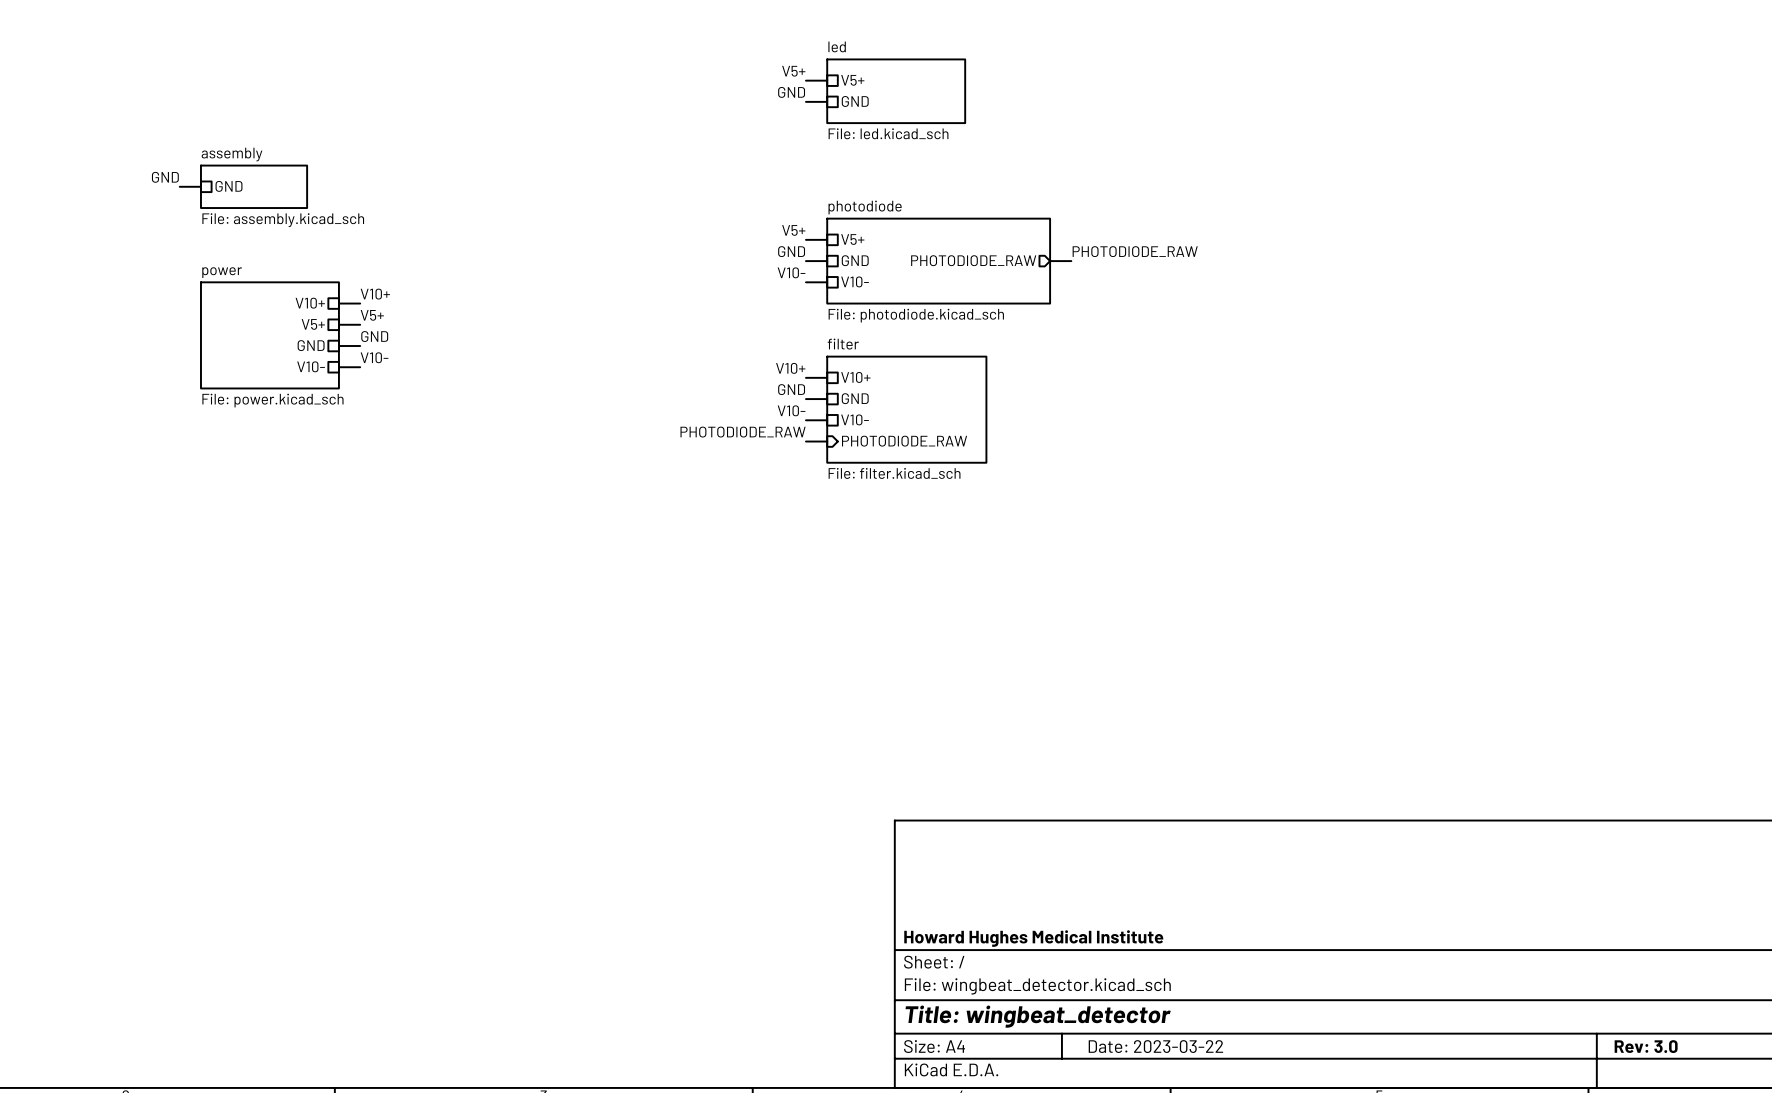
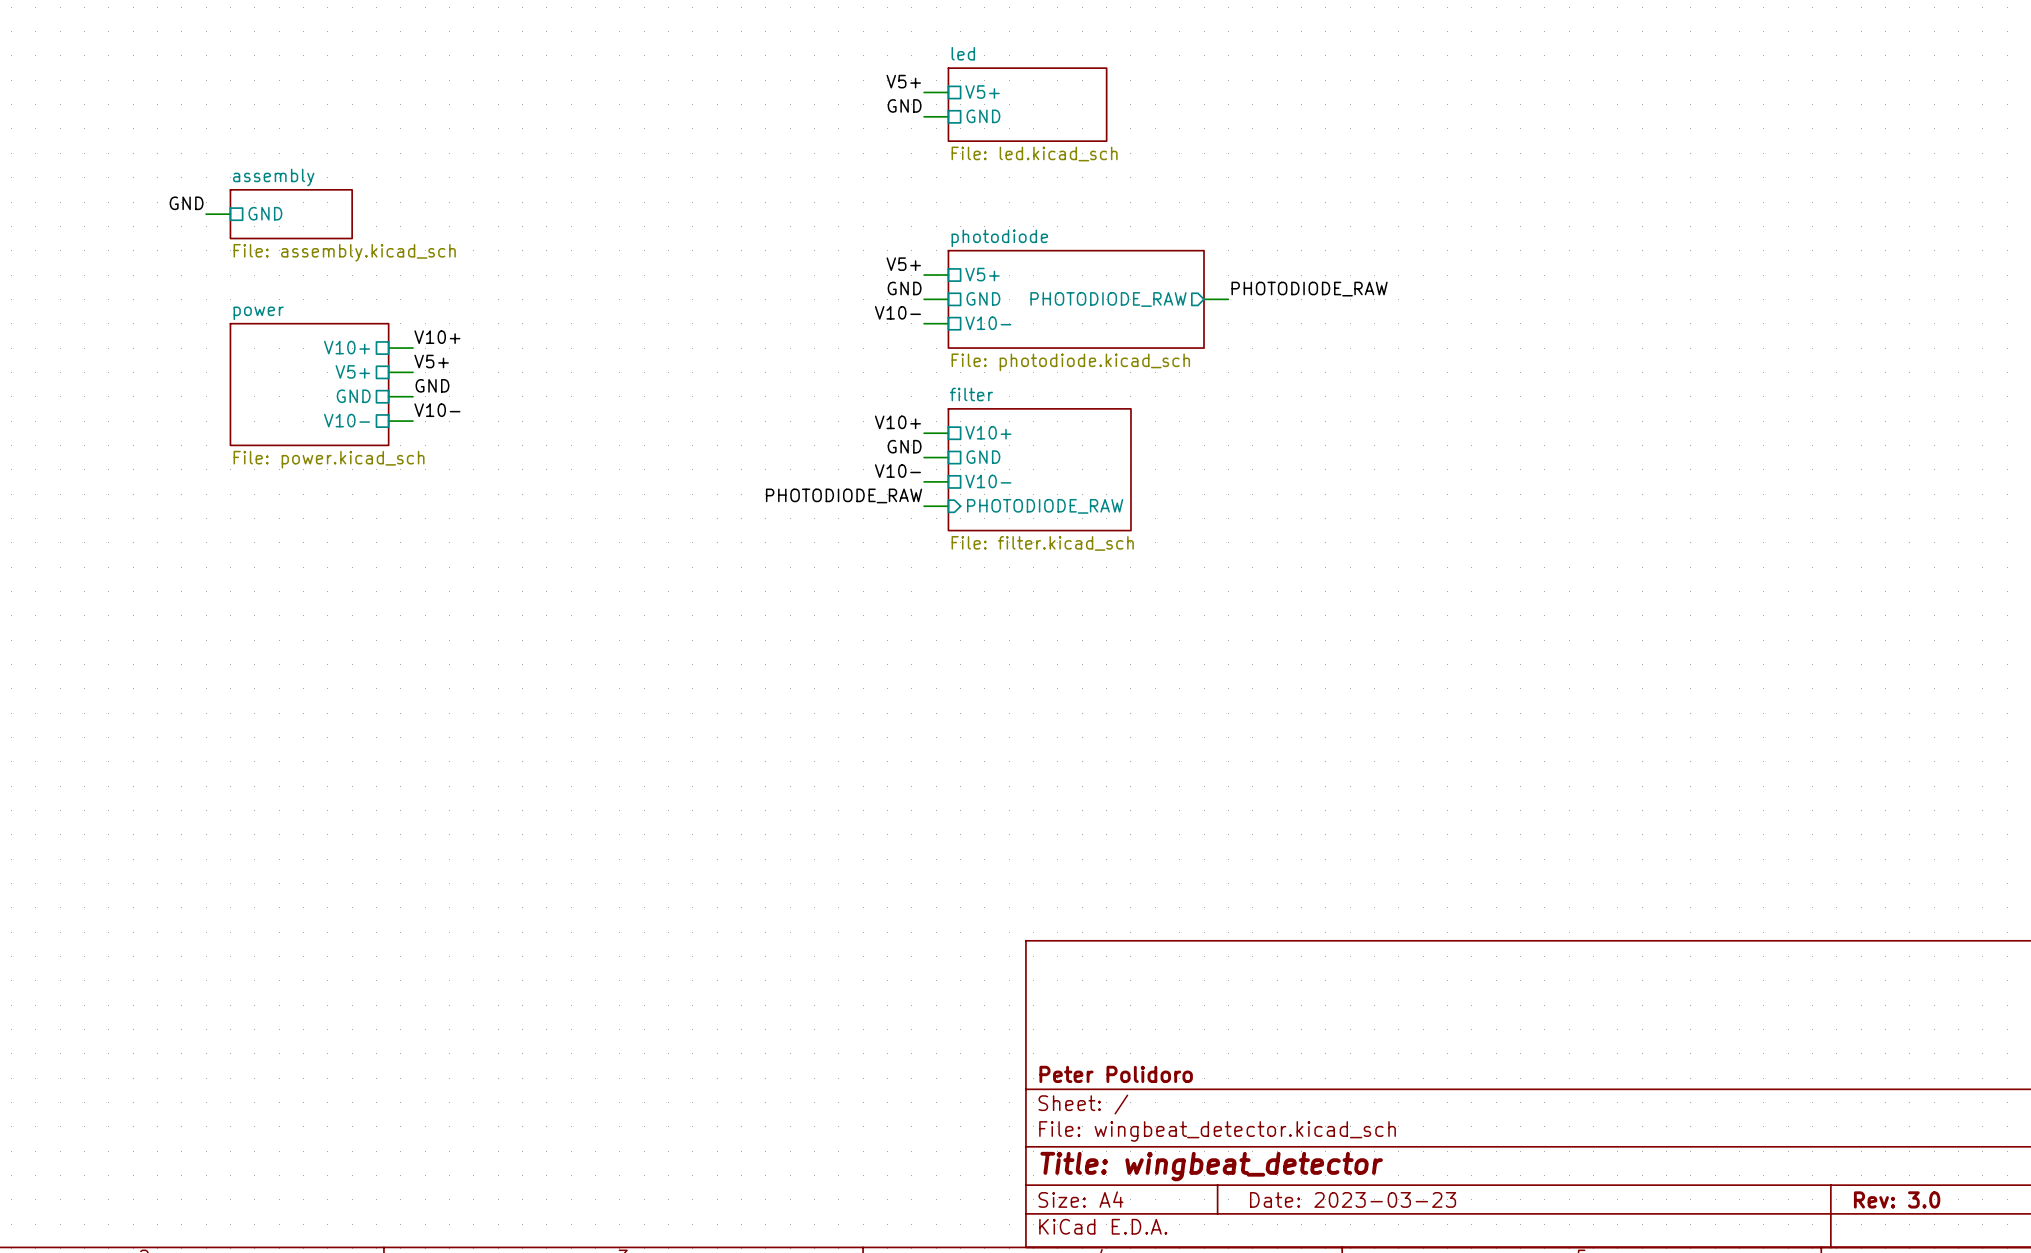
title block: Howard Hughes Medical Institute (1033, 938) -> Peter Polidoro (1116, 1074)
title block: Date: 2023-03-22 (1155, 1046) -> Date: 2023-03-23 (1353, 1199)

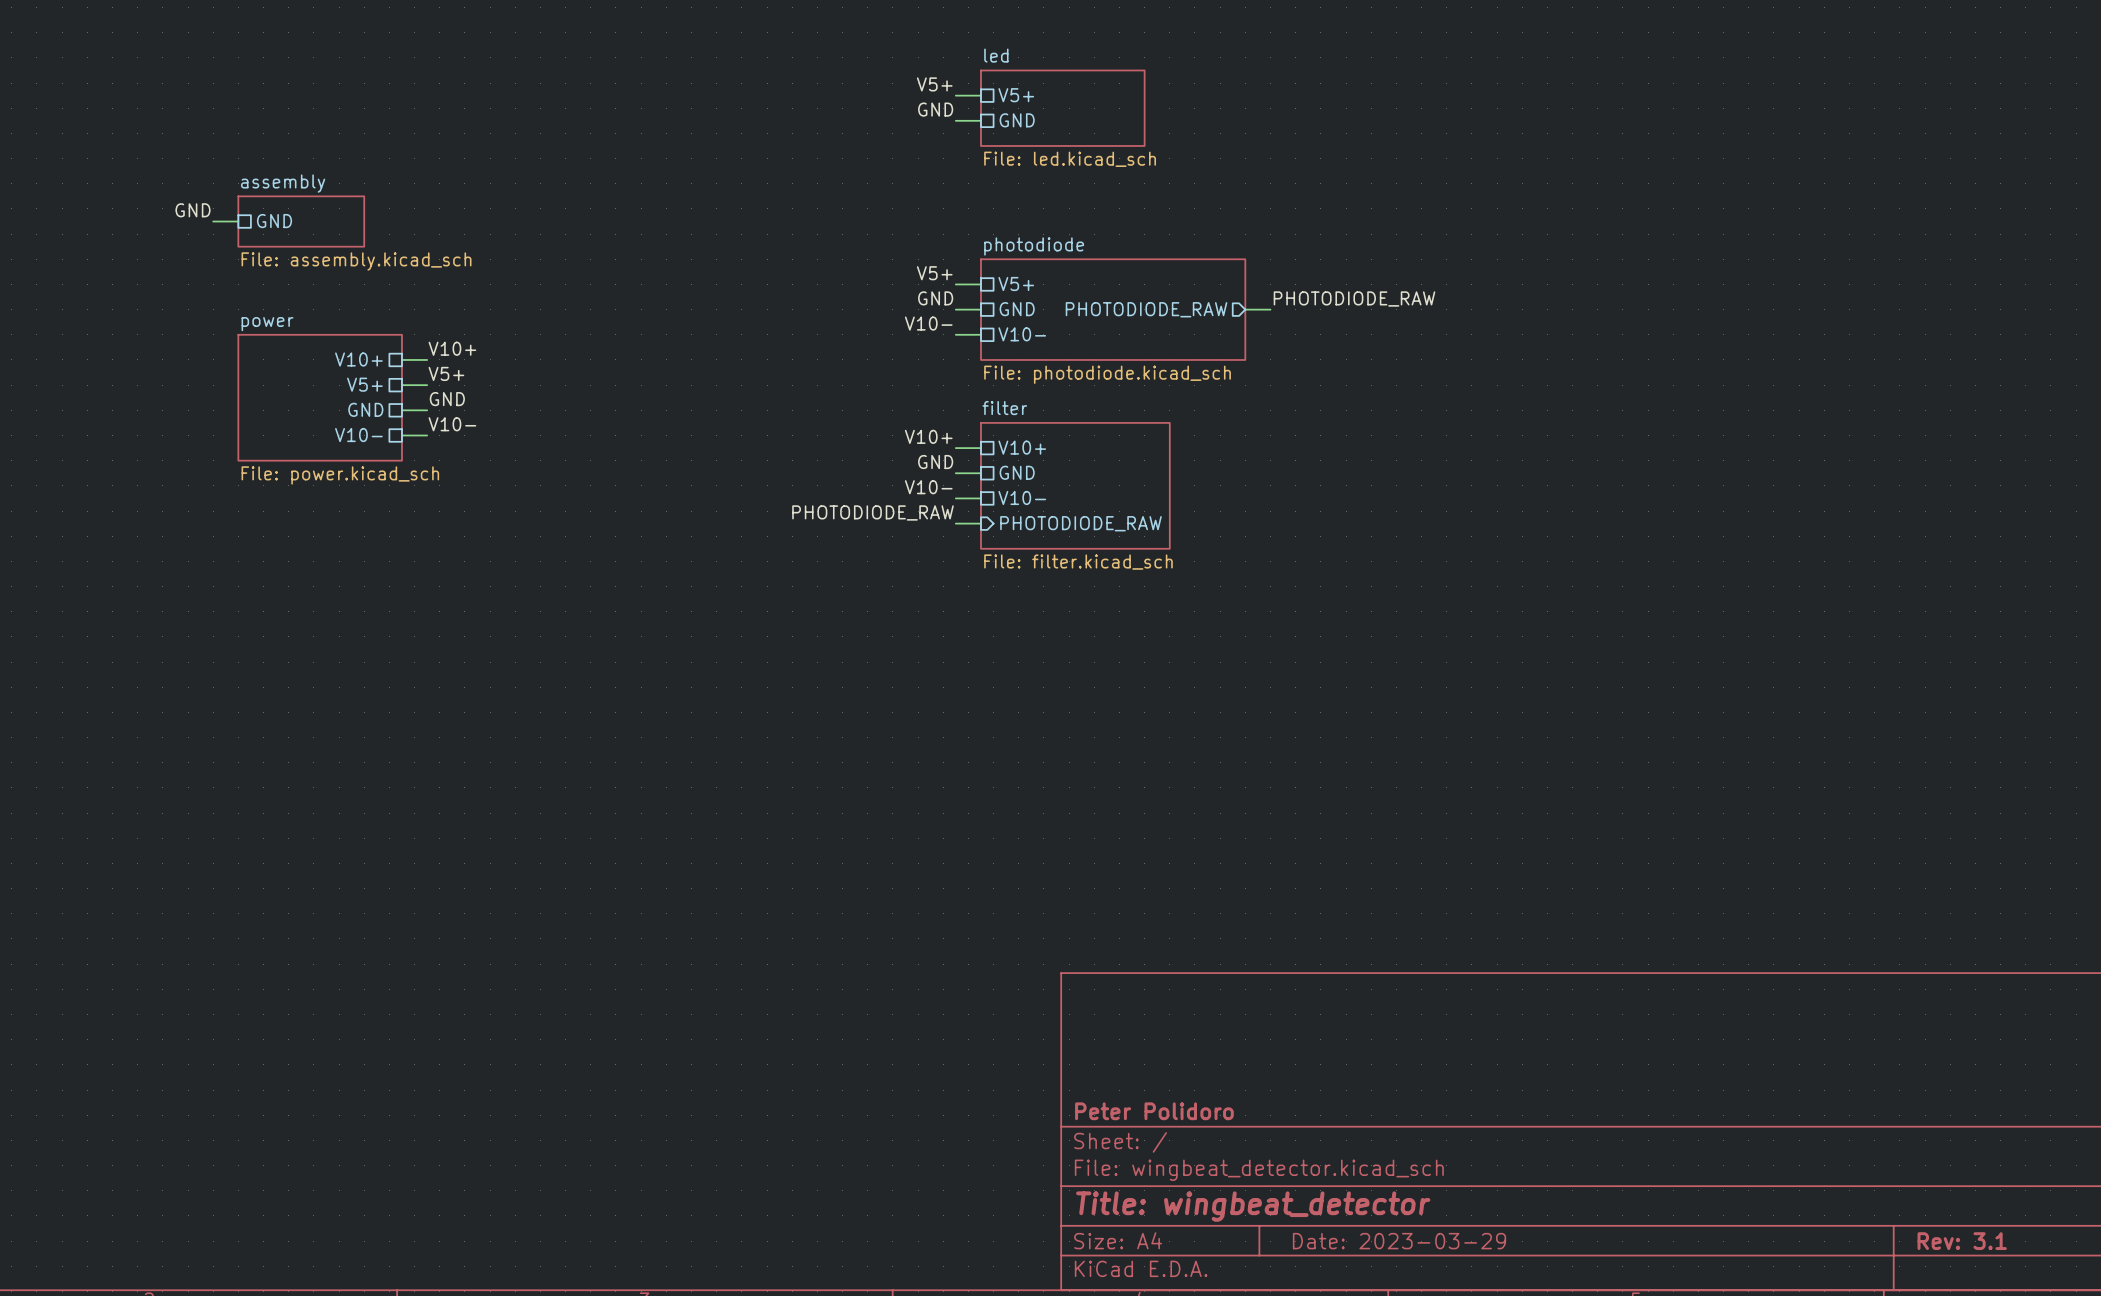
title block: Date: 2023-03-23 (1353, 1199) -> Date: 2023-03-29 (1399, 1241)
title block: Rev: 3.0 (1897, 1199) -> Rev: 3.1 (1962, 1241)

